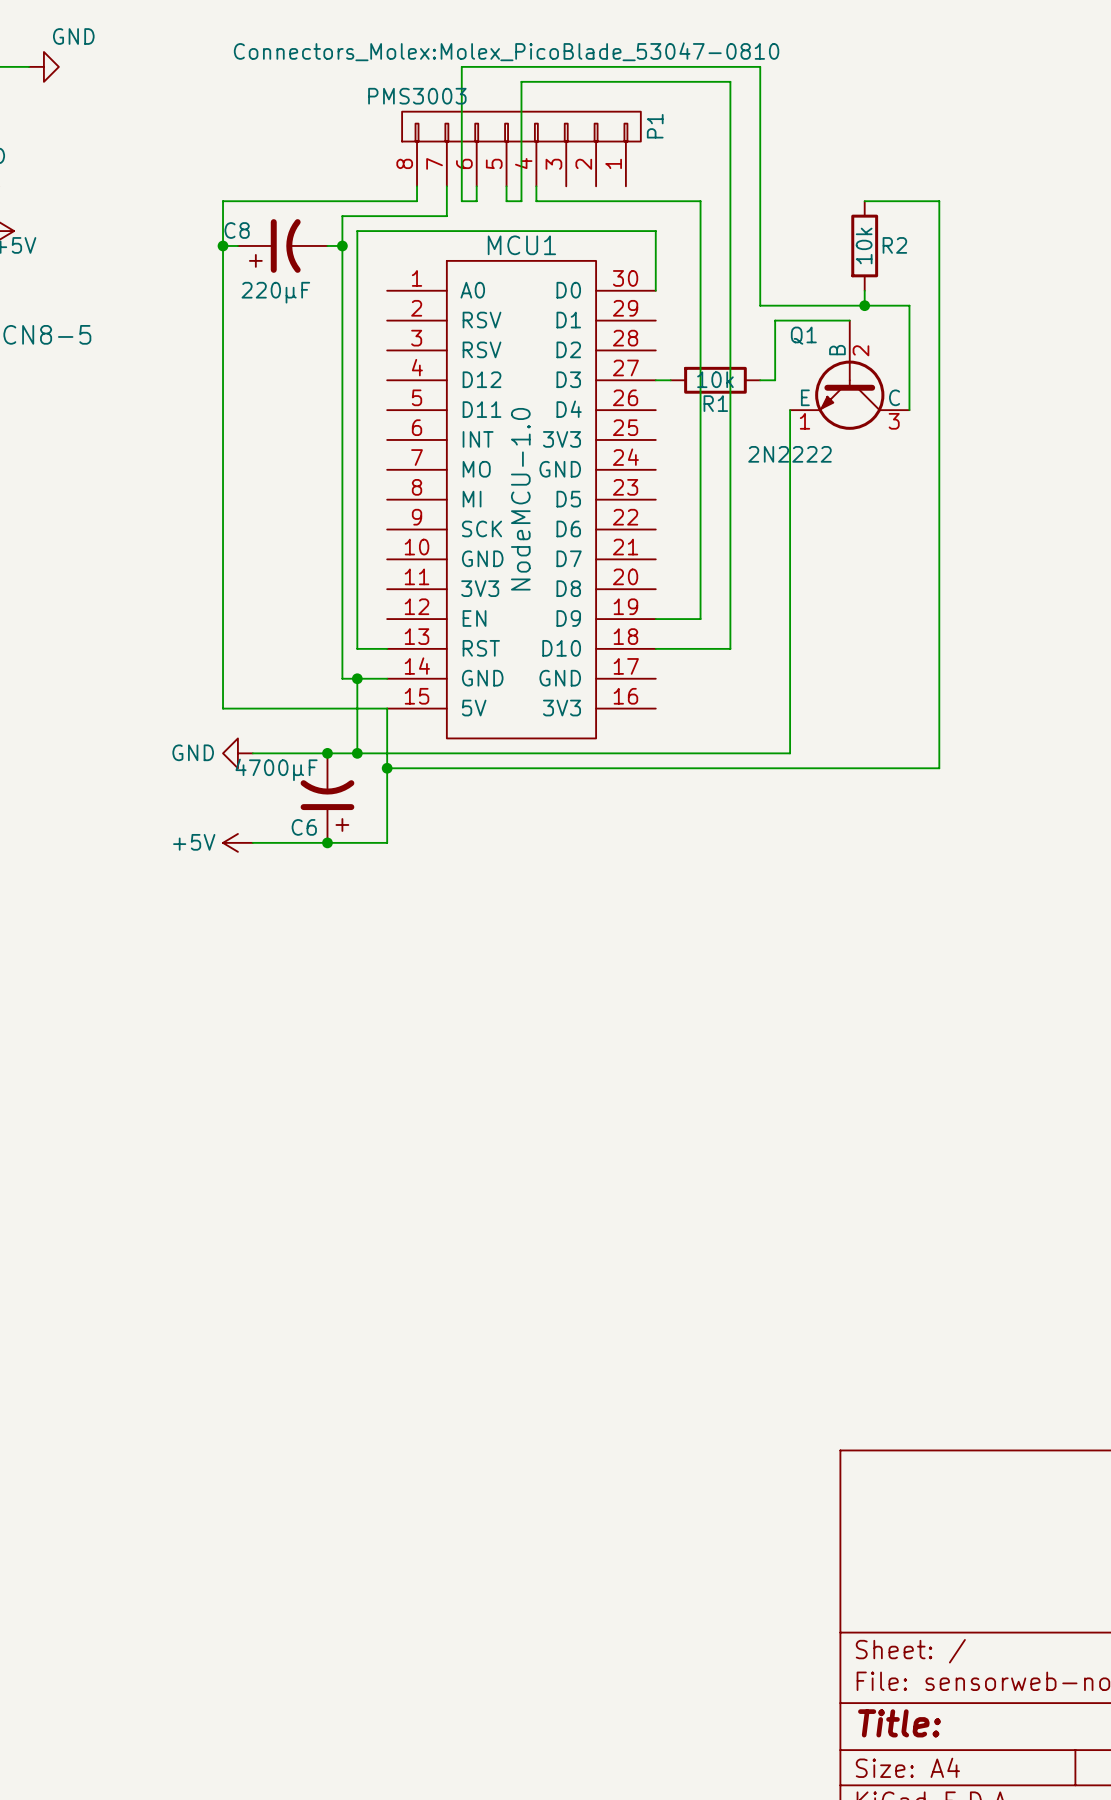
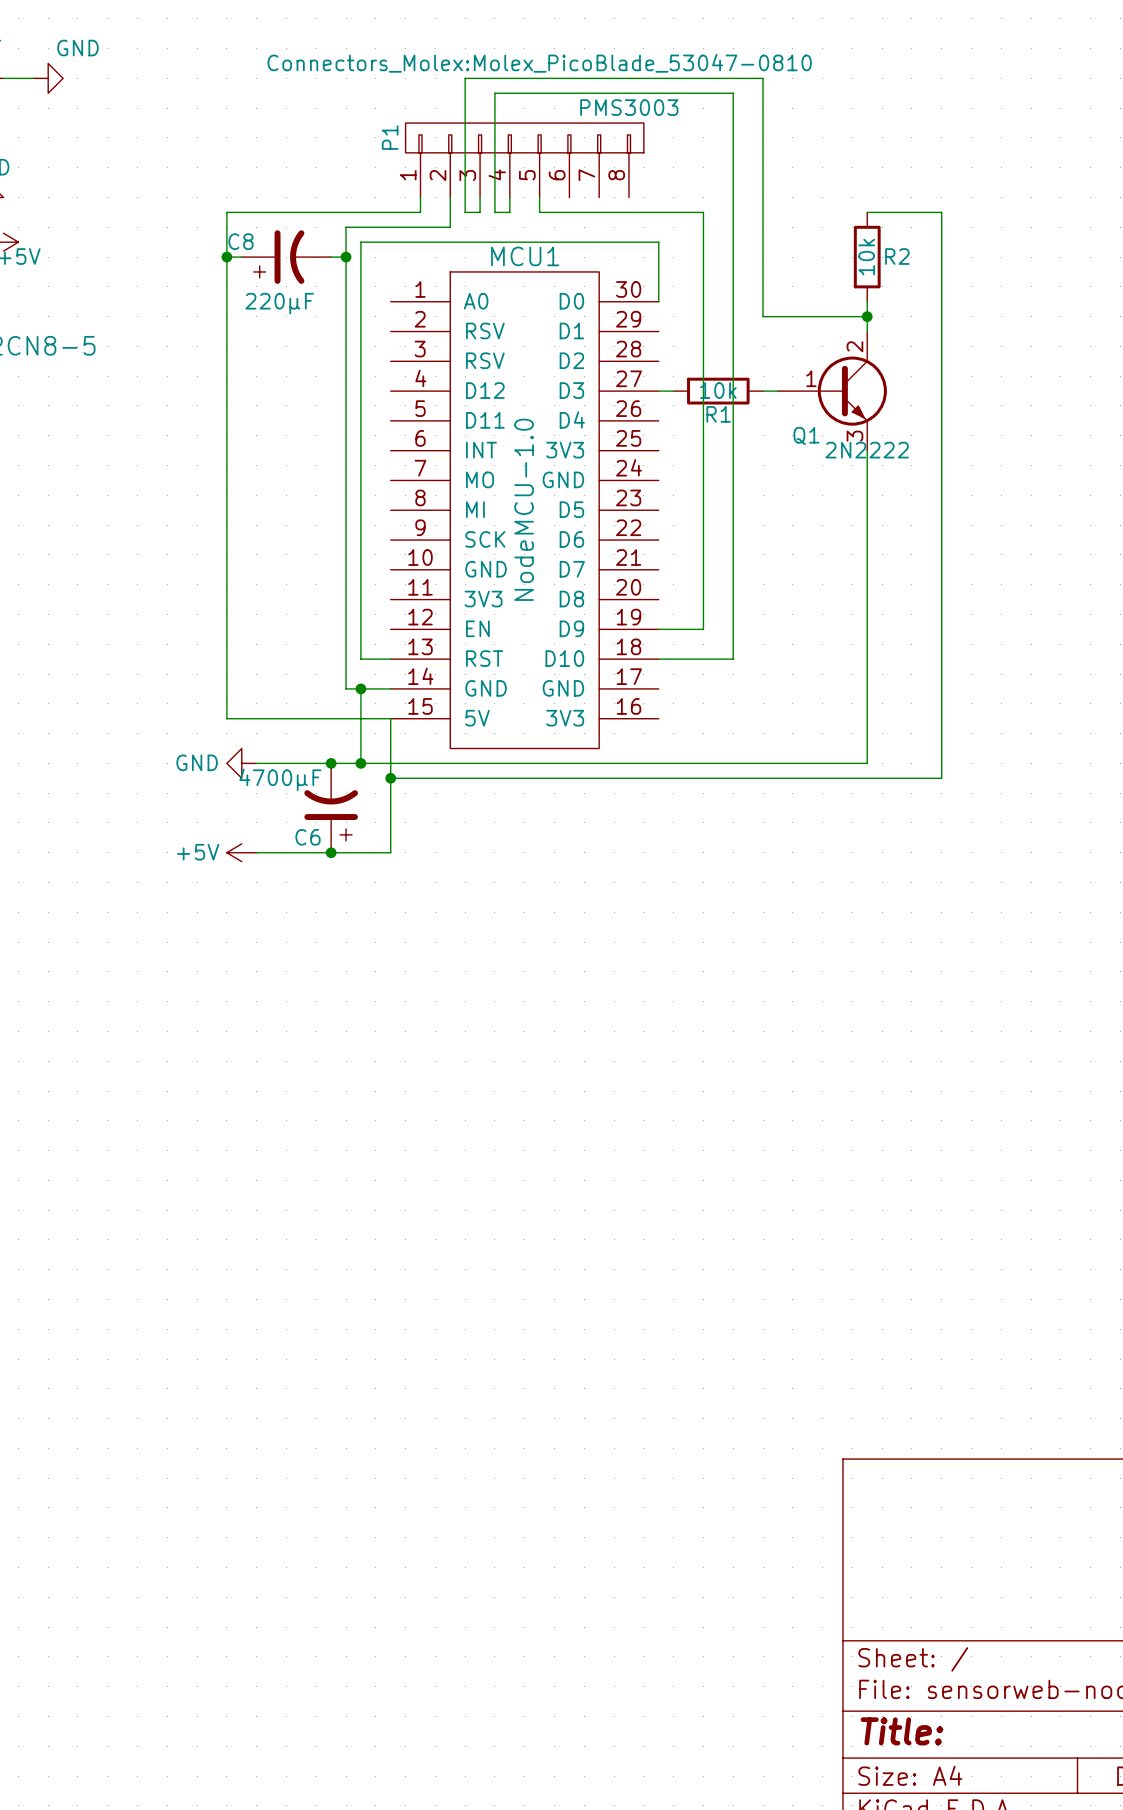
wire: (521, 81) (521, 201) (506, 201) -> (524, 93) (494, 93) (494, 212) (509, 212)
P1 flip: as is (521, 126) -> left-right (524, 137)
wire: (864, 305) (909, 305) (909, 410) -> (867, 316) (867, 331)
Q1 symbol: [790, 320, 910, 430] -> [777, 331, 887, 451]
wire: (849, 320) (775, 320) (775, 380) -> none
Q1 name position: Q1 (803, 335) -> Q1 (806, 435)
wire: (790, 410) (790, 753) -> (867, 450) (867, 763) (792, 763)
Q1 value position: 2N2222 (789, 454) -> 2N2222 (867, 450)

